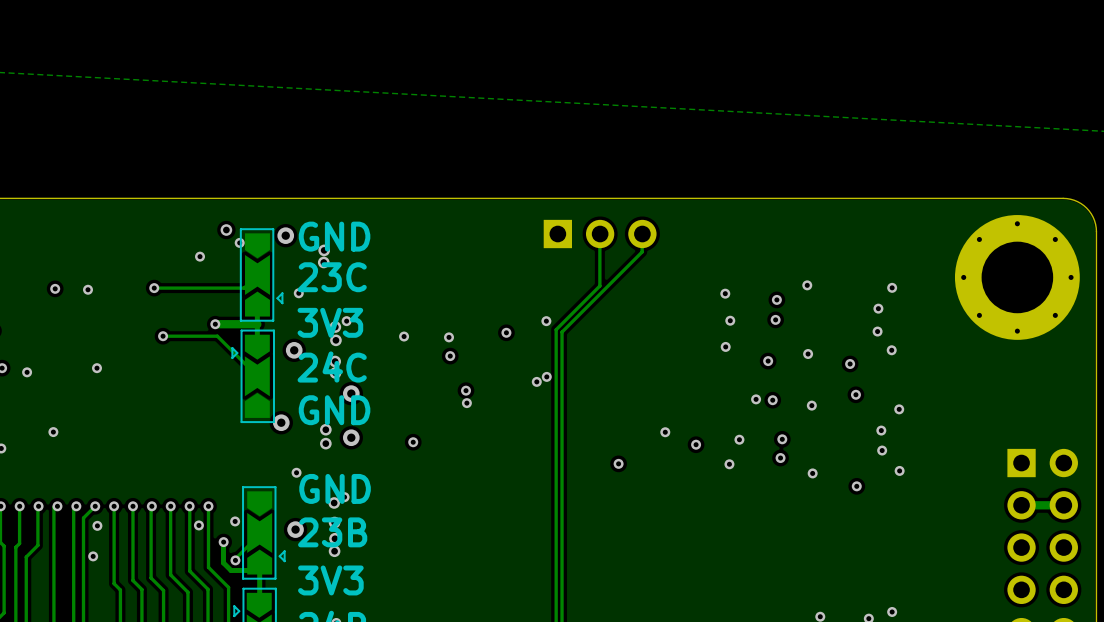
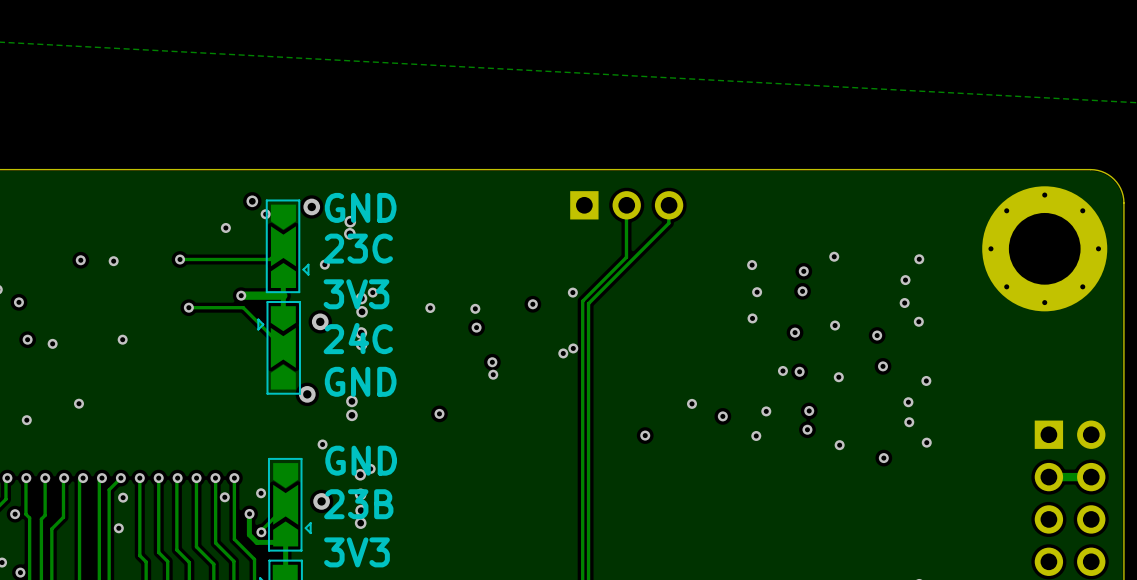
via: (351, 393) -> none
via: (351, 437) -> none

